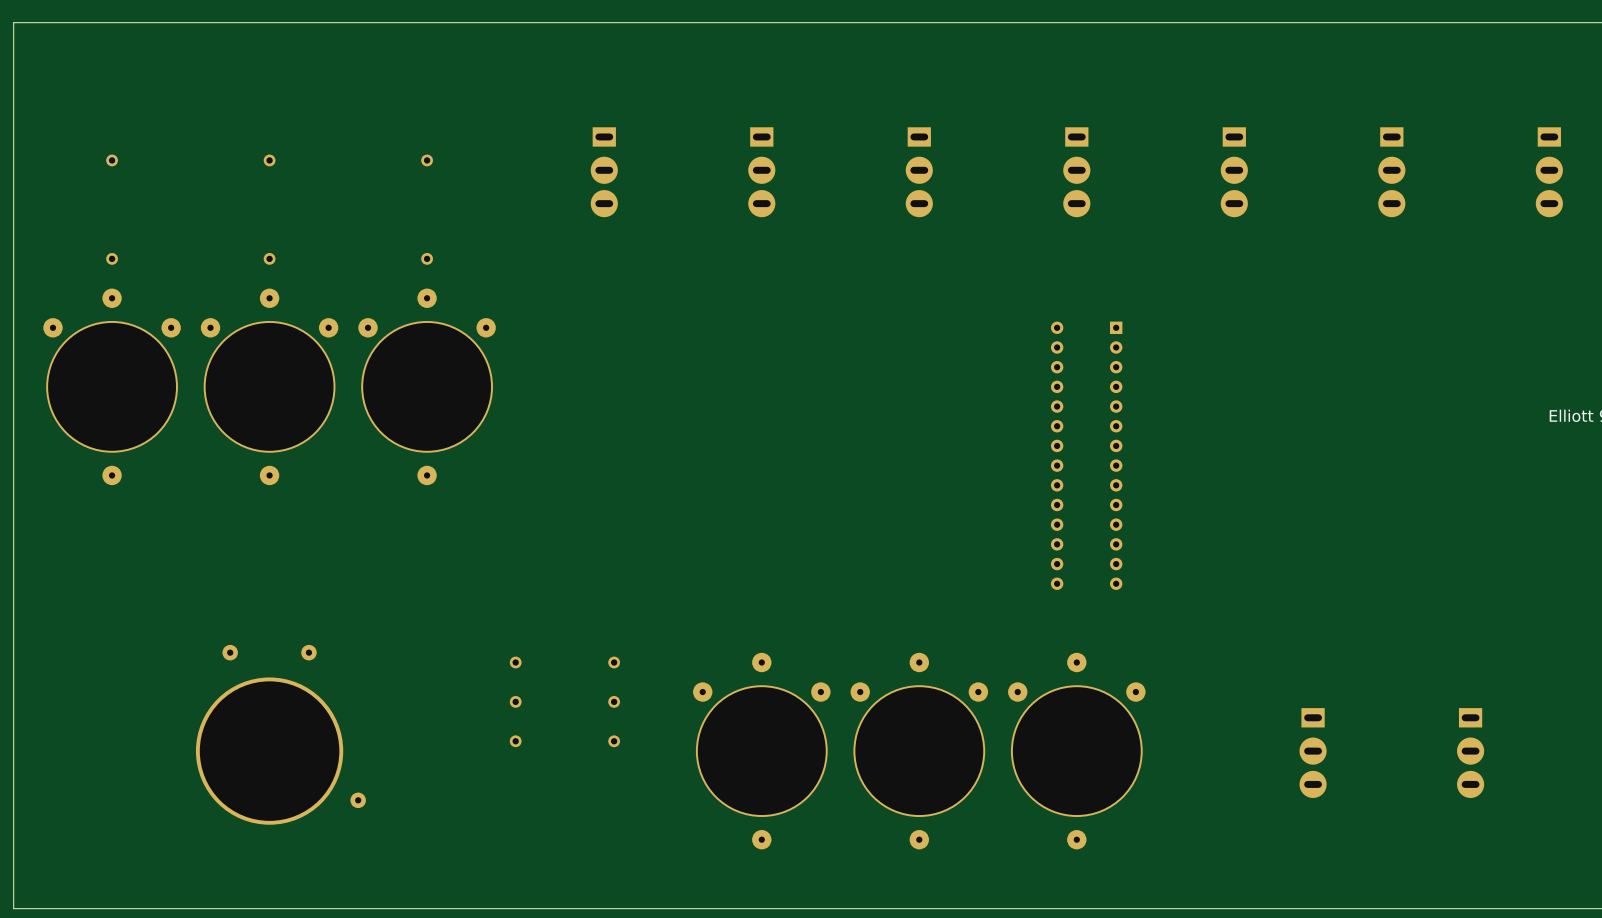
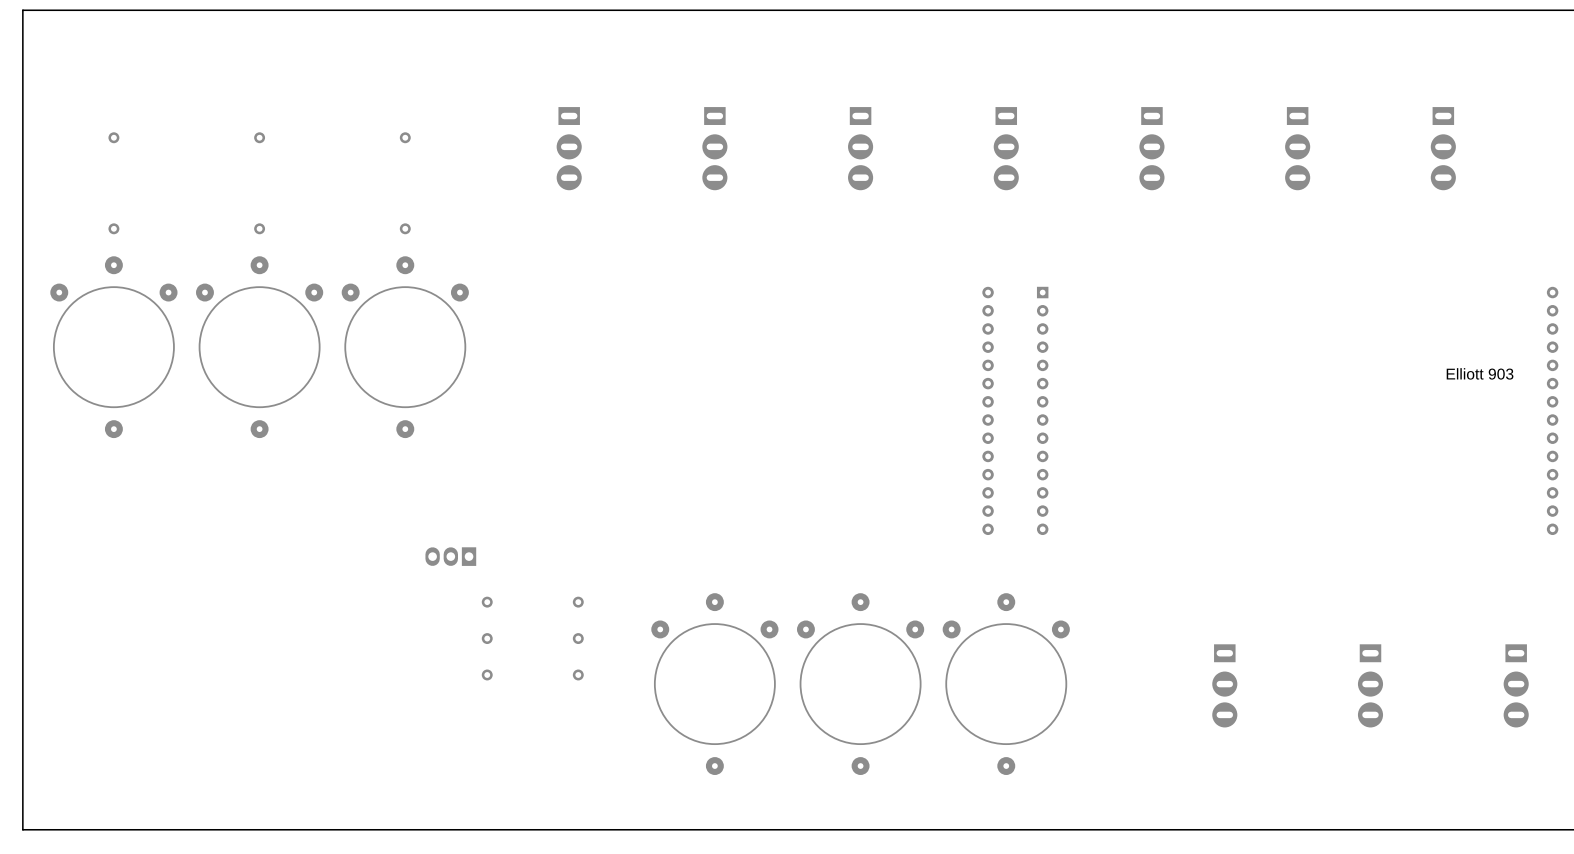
part: none -> (450, 556)
part: (280, 734) -> none

